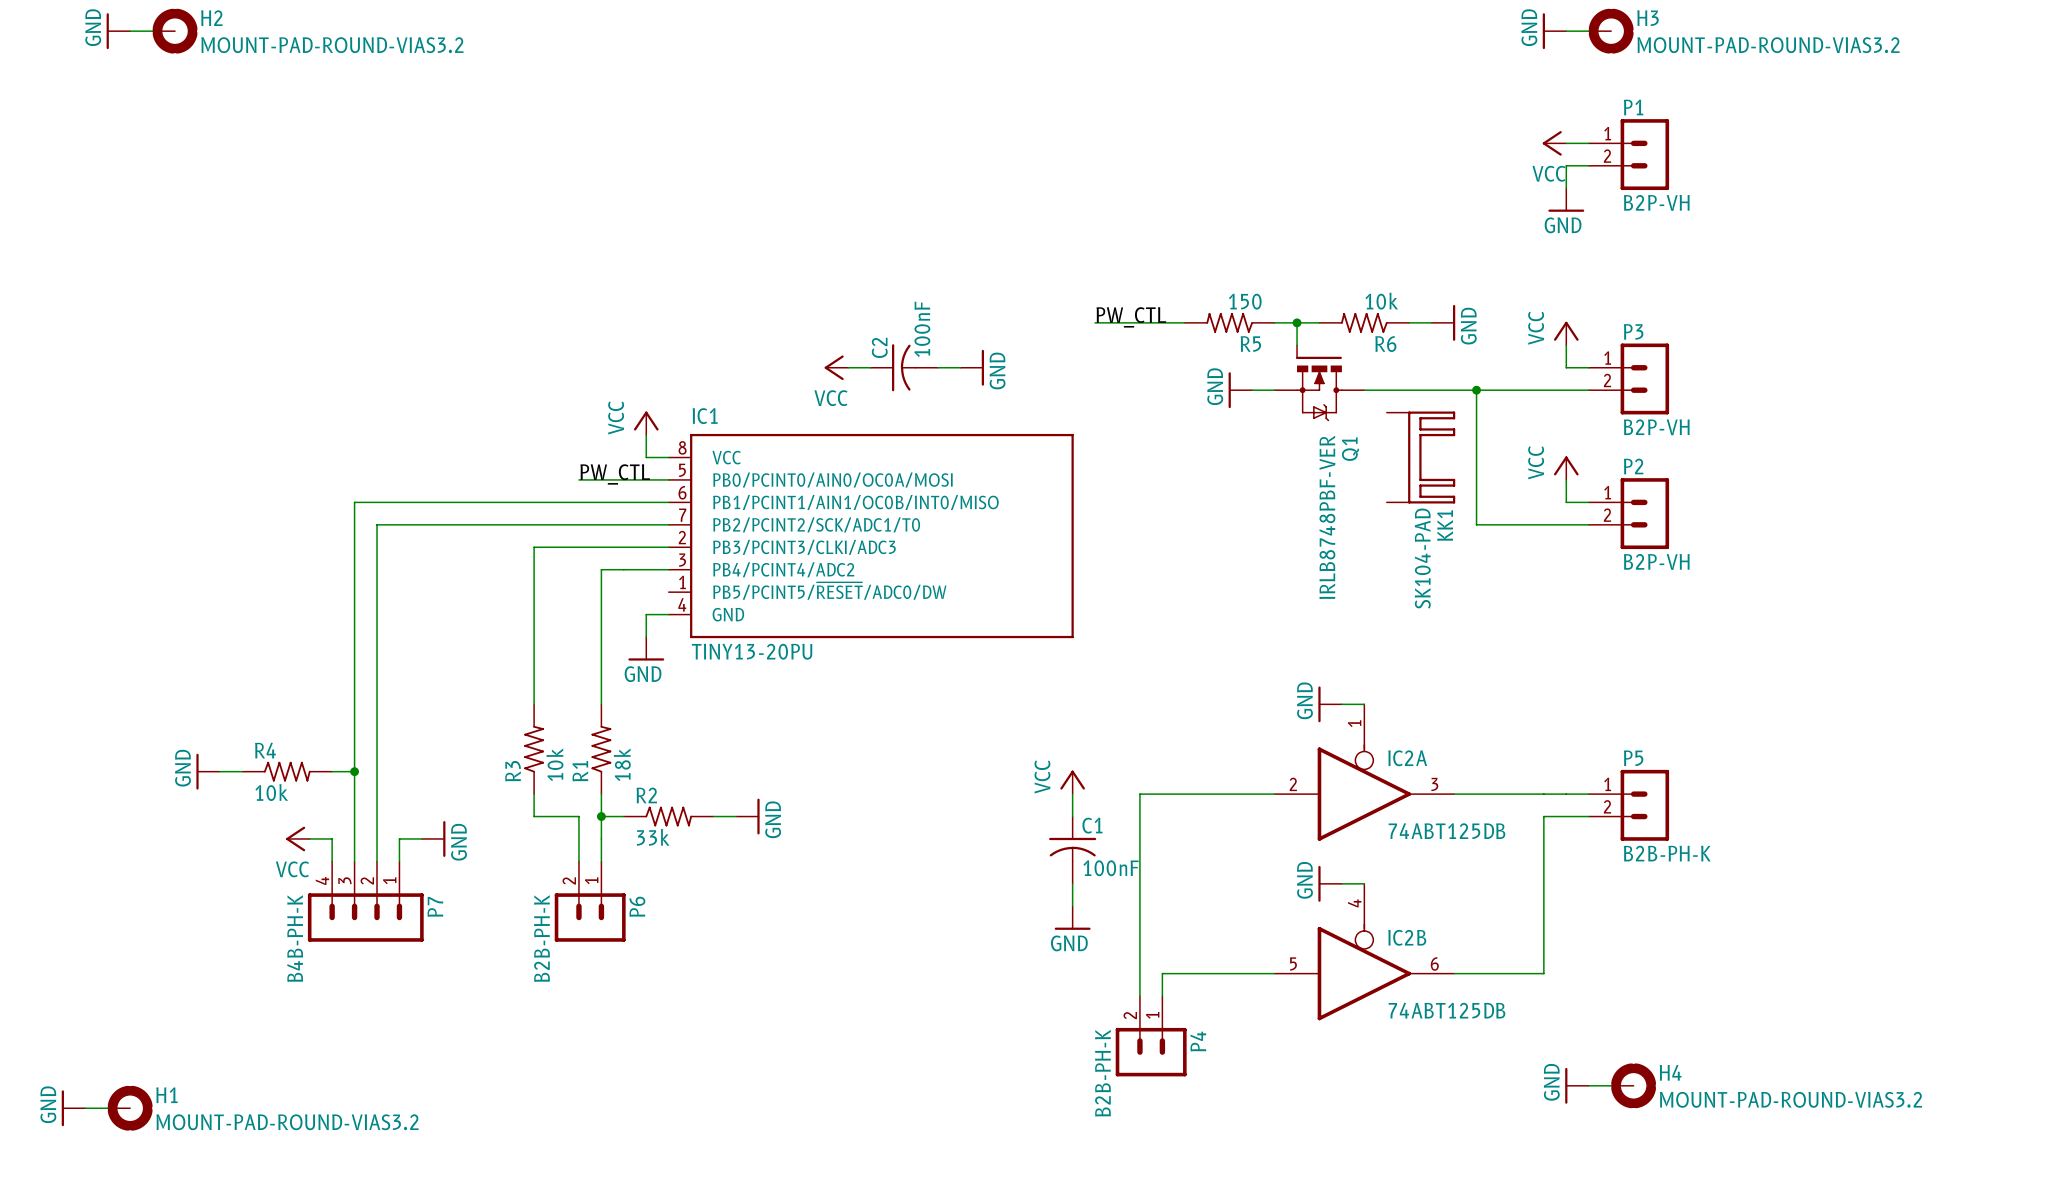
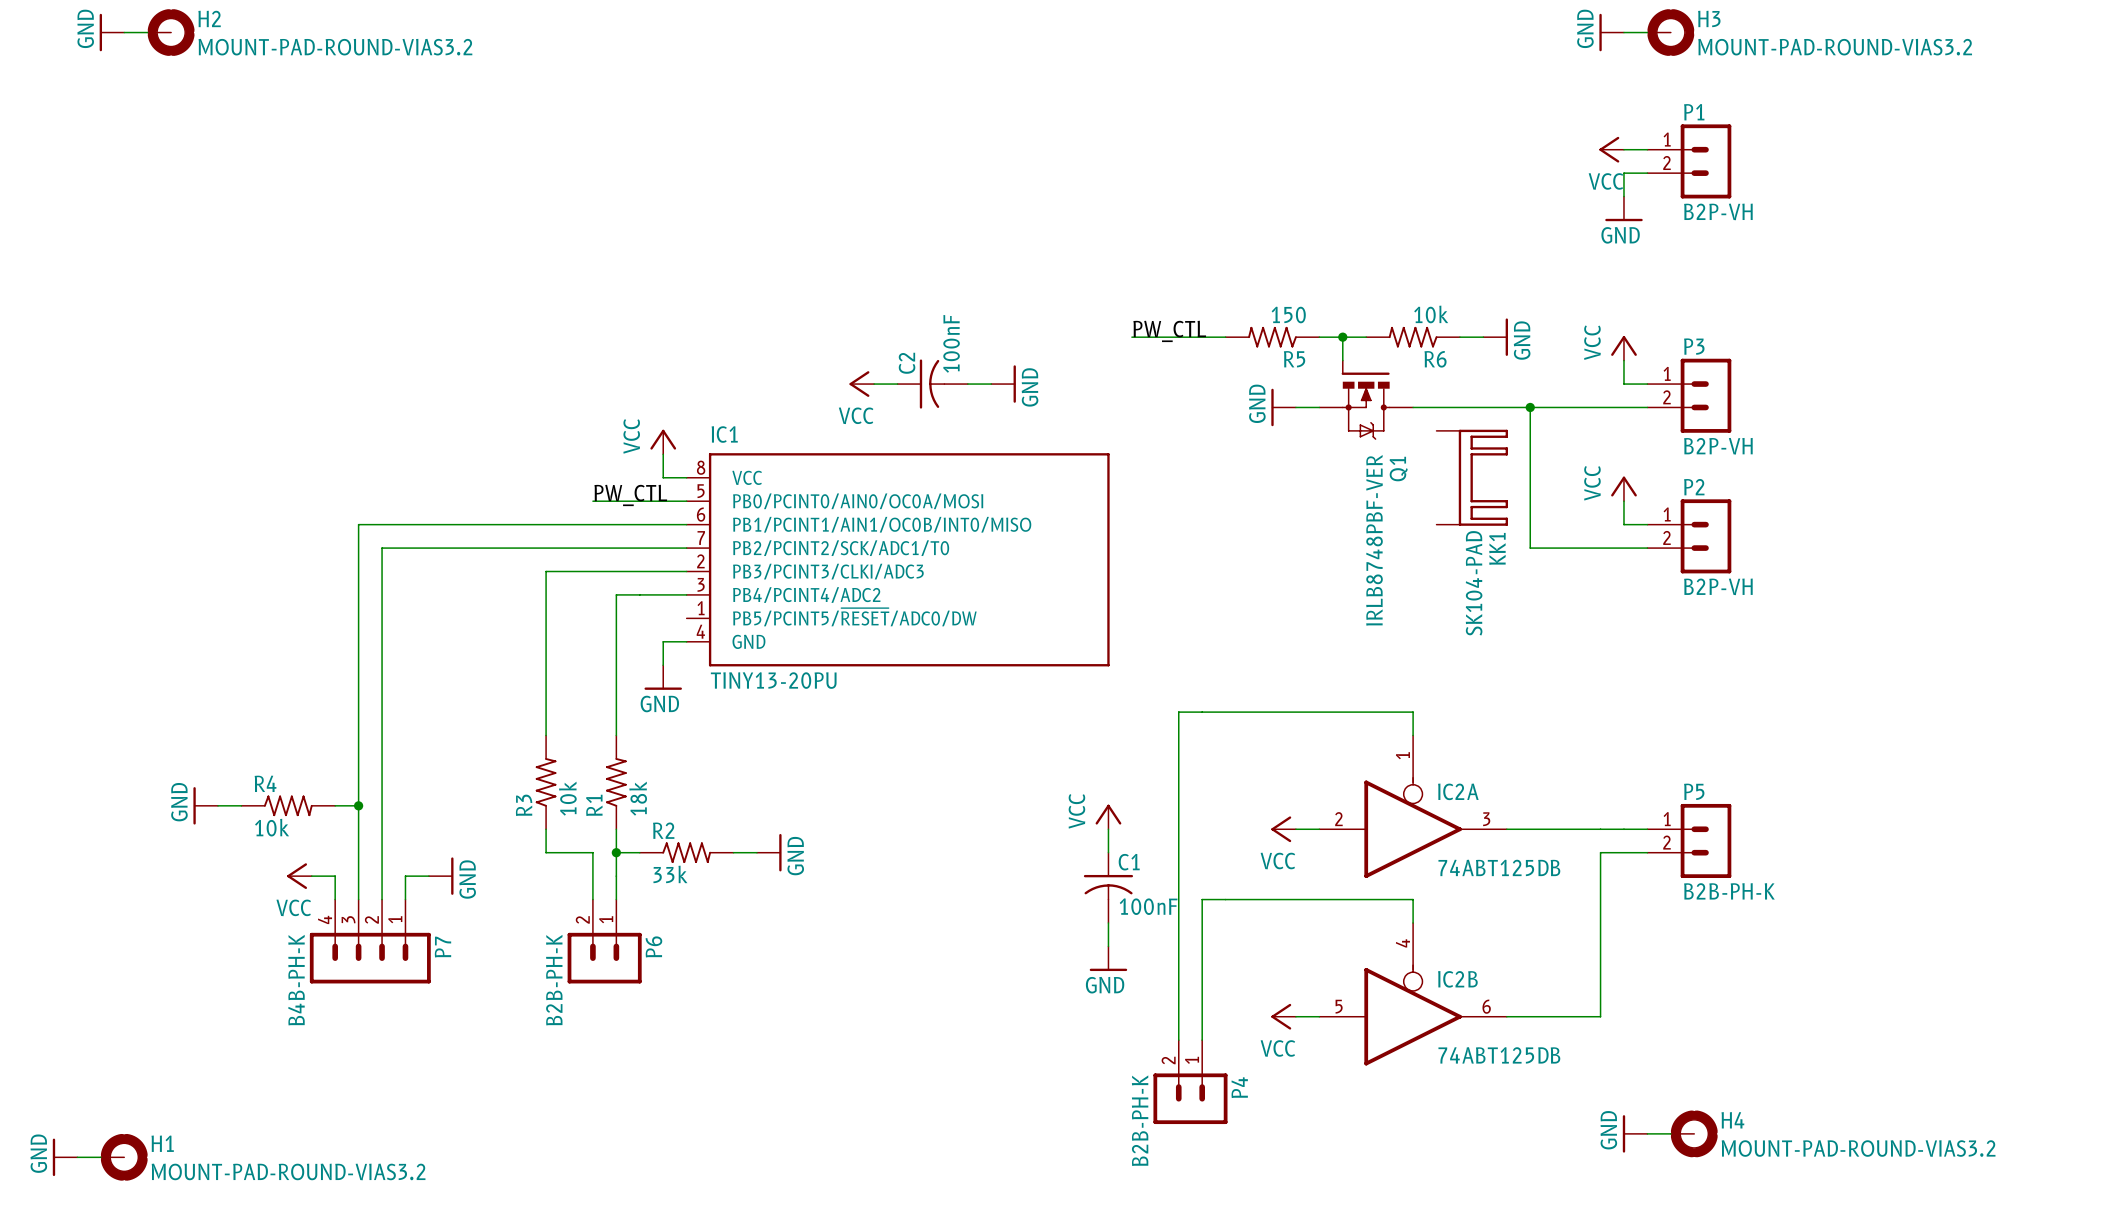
power symbol: GND (1330, 704) -> none
wire: (1341, 704) (1364, 704) -> none
wire: (1139, 794) (1252, 794) -> (1178, 829) (1178, 712) (1413, 712) (1413, 735)
power symbol: none -> VCC (1283, 829)
power symbol: GND (1330, 883) -> none
wire: (1341, 883) (1364, 883) -> none
wire: (1162, 973) (1252, 973) -> (1202, 1016) (1202, 899) (1413, 899) (1413, 923)
power symbol: none -> VCC (1283, 1016)

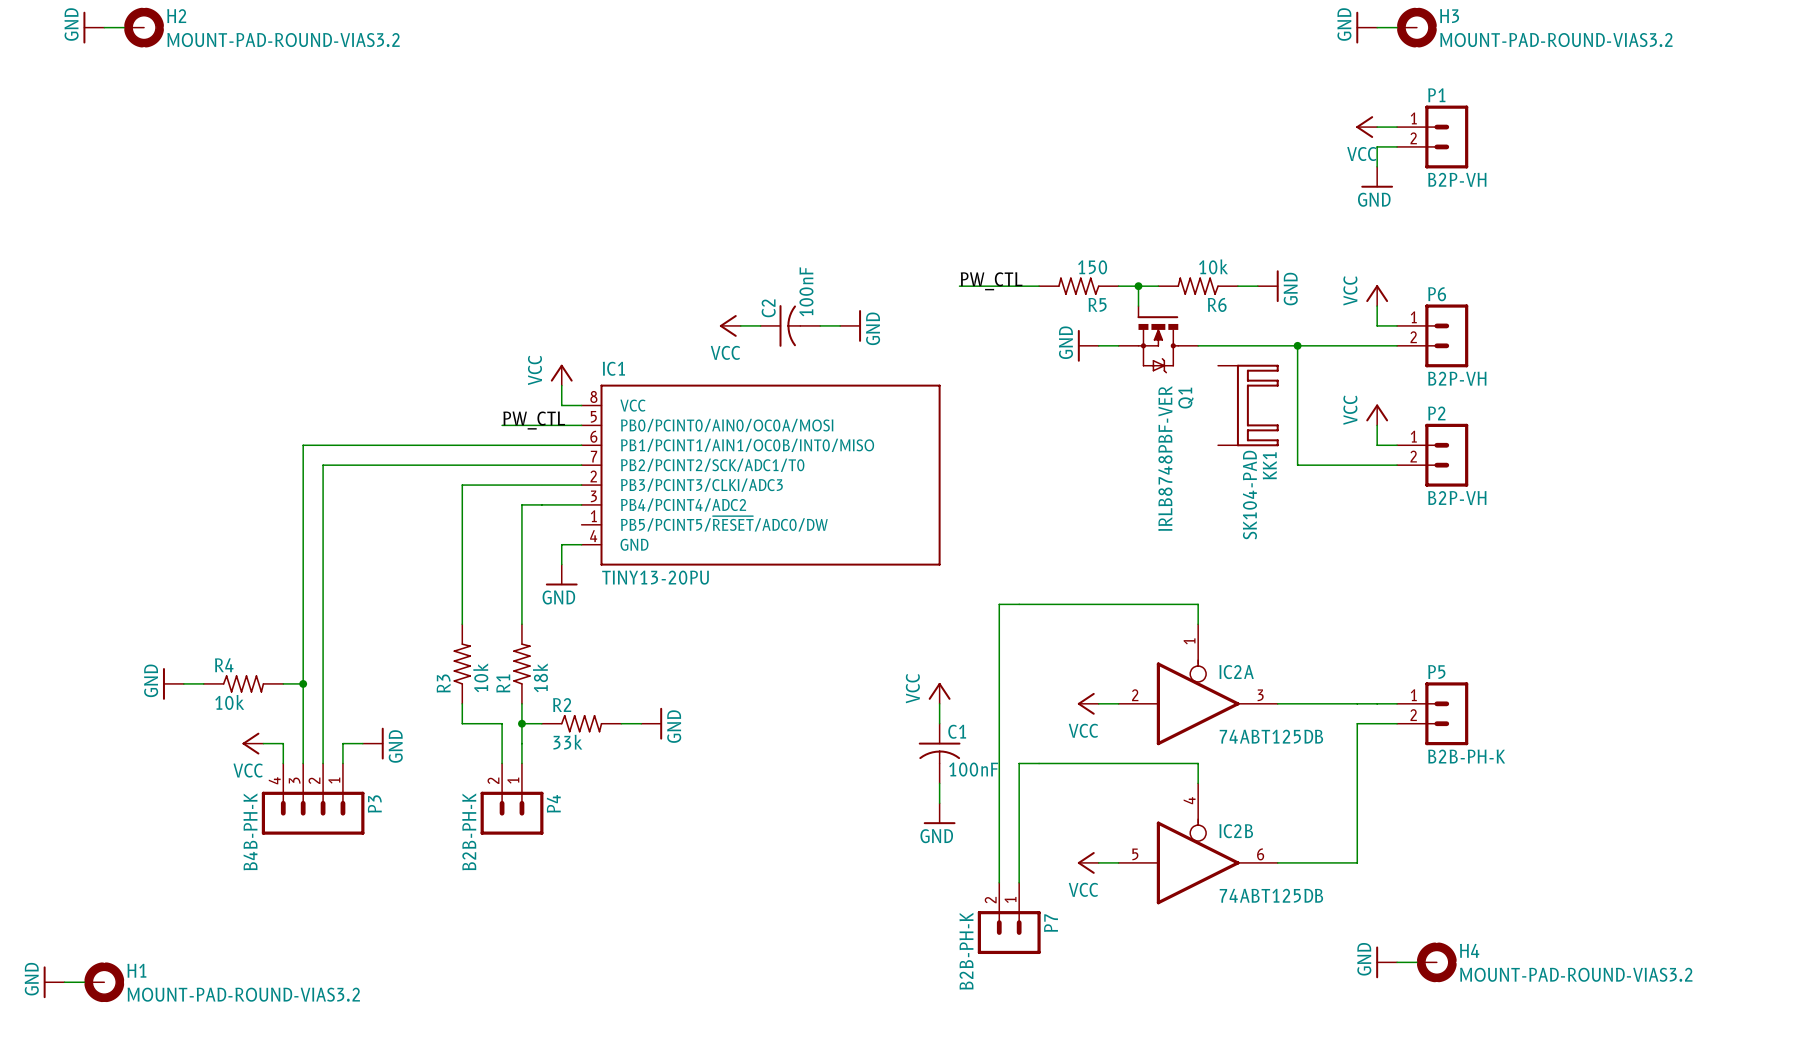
P3 name: P3 (1694, 346) -> P6 (1437, 294)
P6 name: P6 (653, 946) -> P4 (553, 803)
P7 name: P7 (443, 947) -> P3 (374, 803)
P4 name: P4 (1239, 1087) -> P7 (1051, 923)

